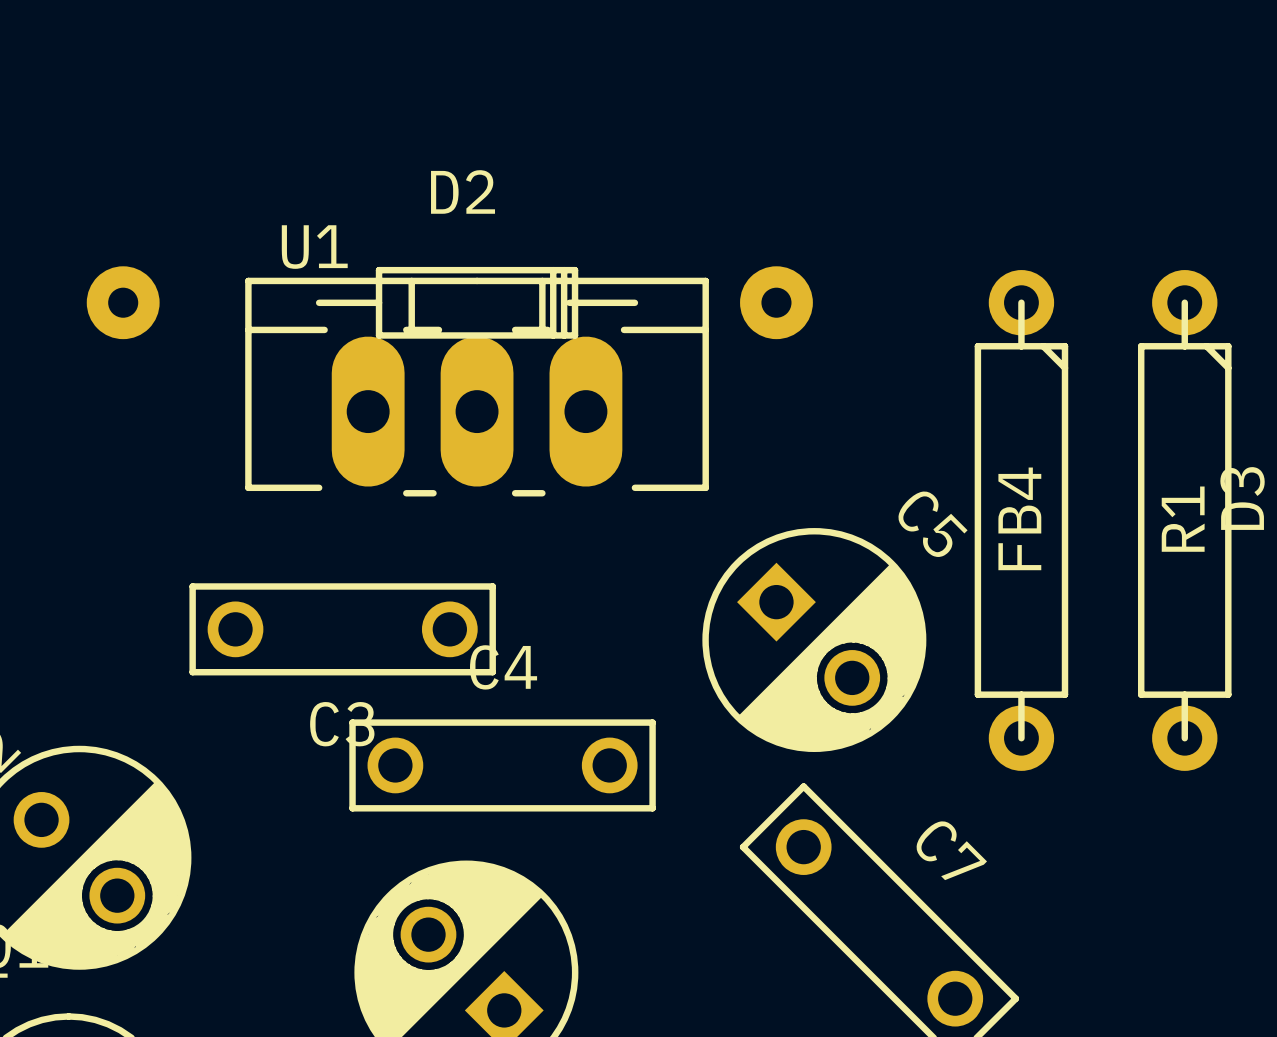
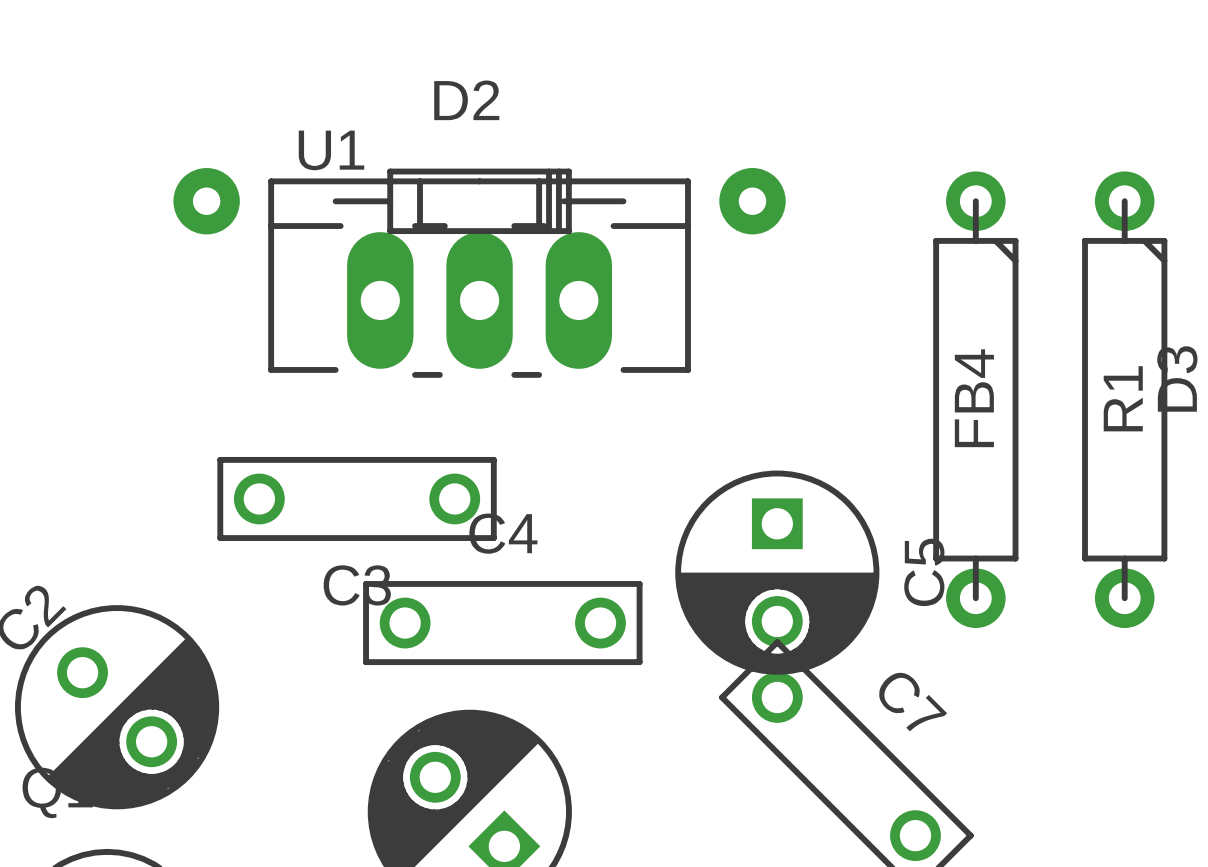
D2 footprint: [86, 266, 813, 340] -> [173, 168, 786, 235]
C5 rotation: 0° (814, 640) -> 45° clockwise (777, 572)

